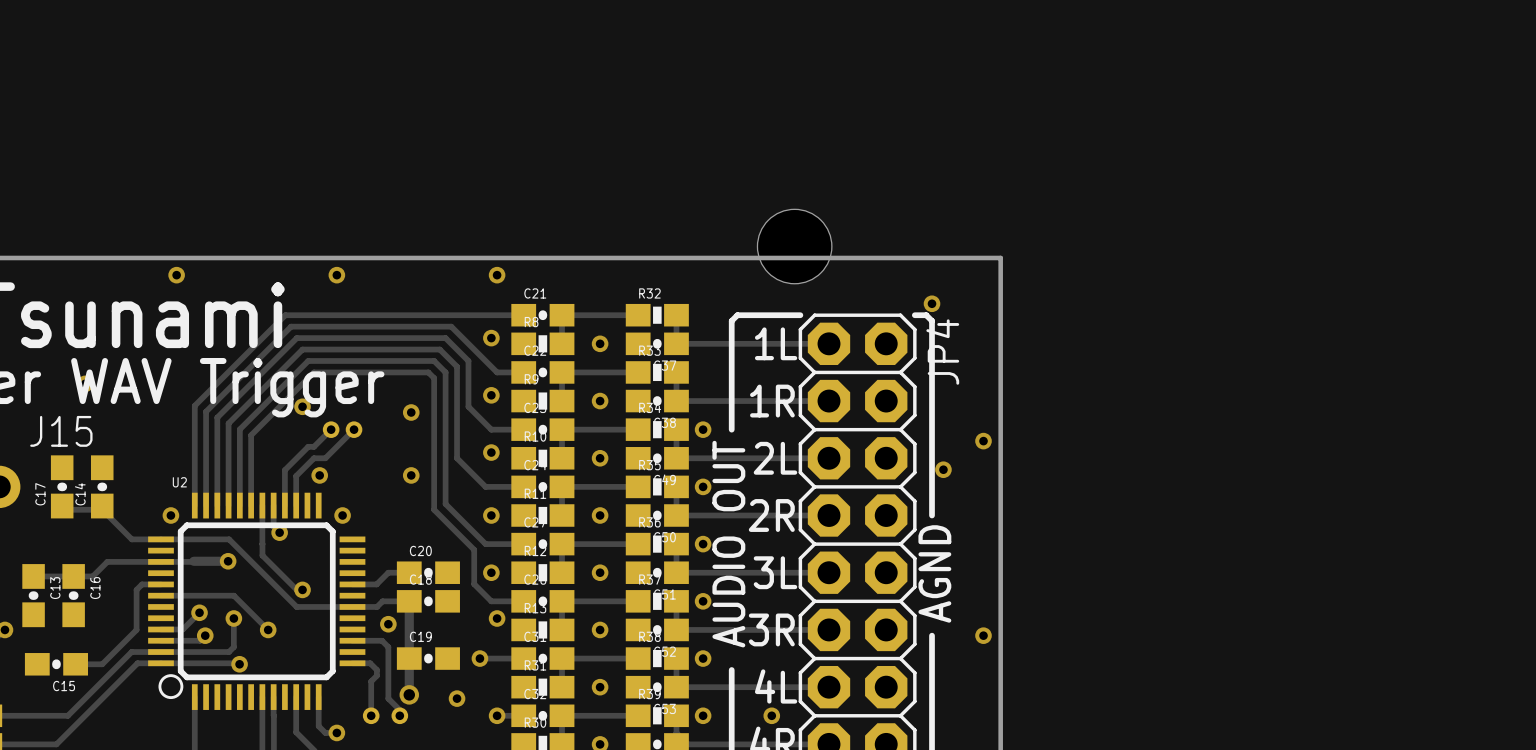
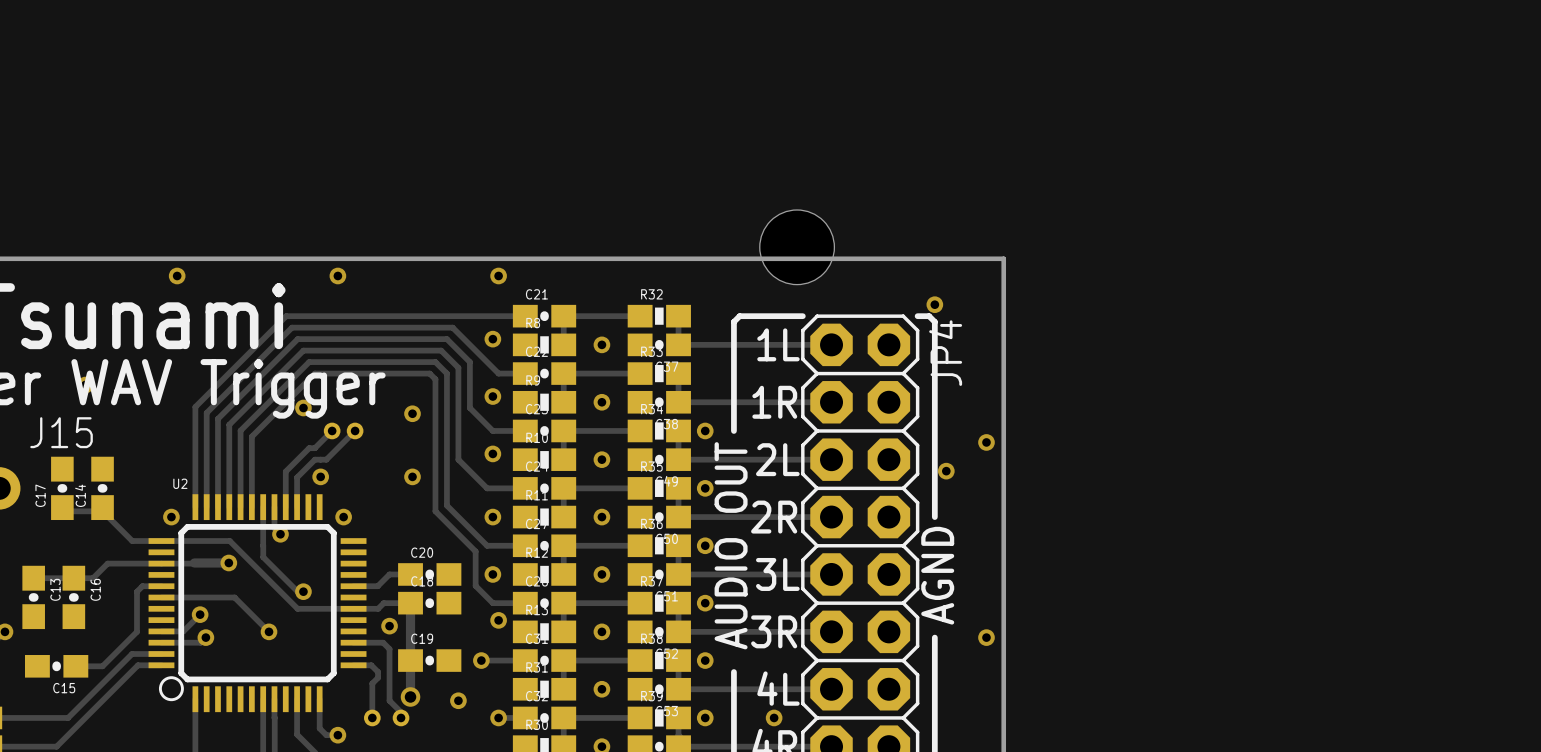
track: (233, 618) (233, 647) (228, 652) (161, 652) -> none
via: (233, 618) -> none
track: (161, 663) (239, 664) -> none
via: (239, 664) -> none

